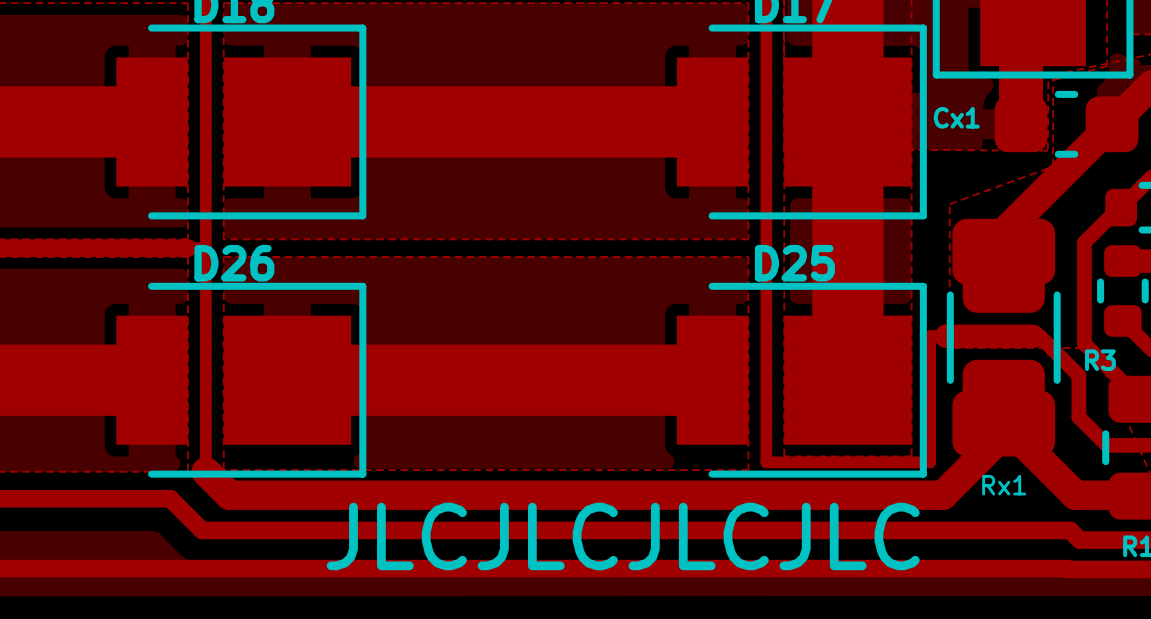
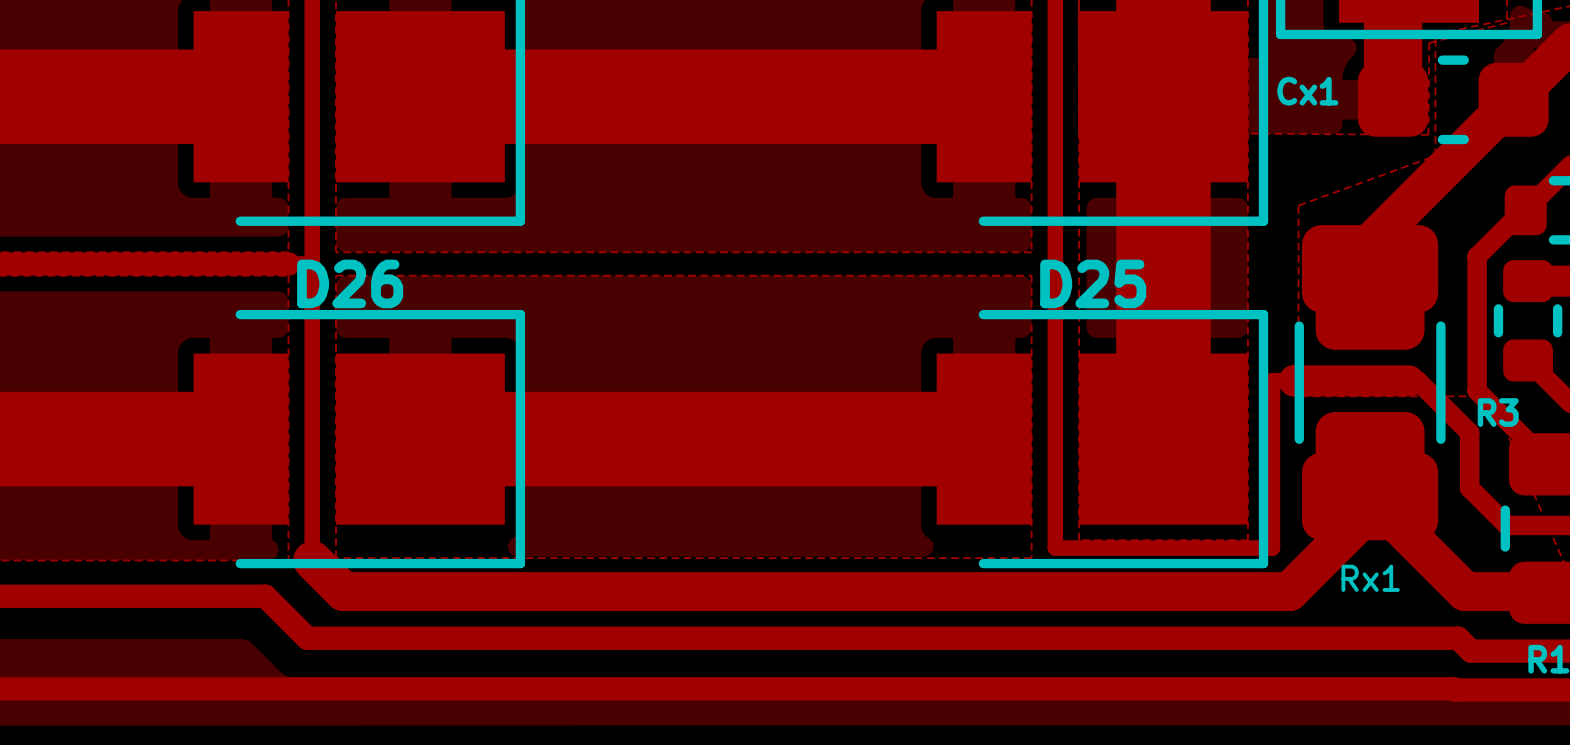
text: JLCJLCJLCJLC (623, 536) -> none

